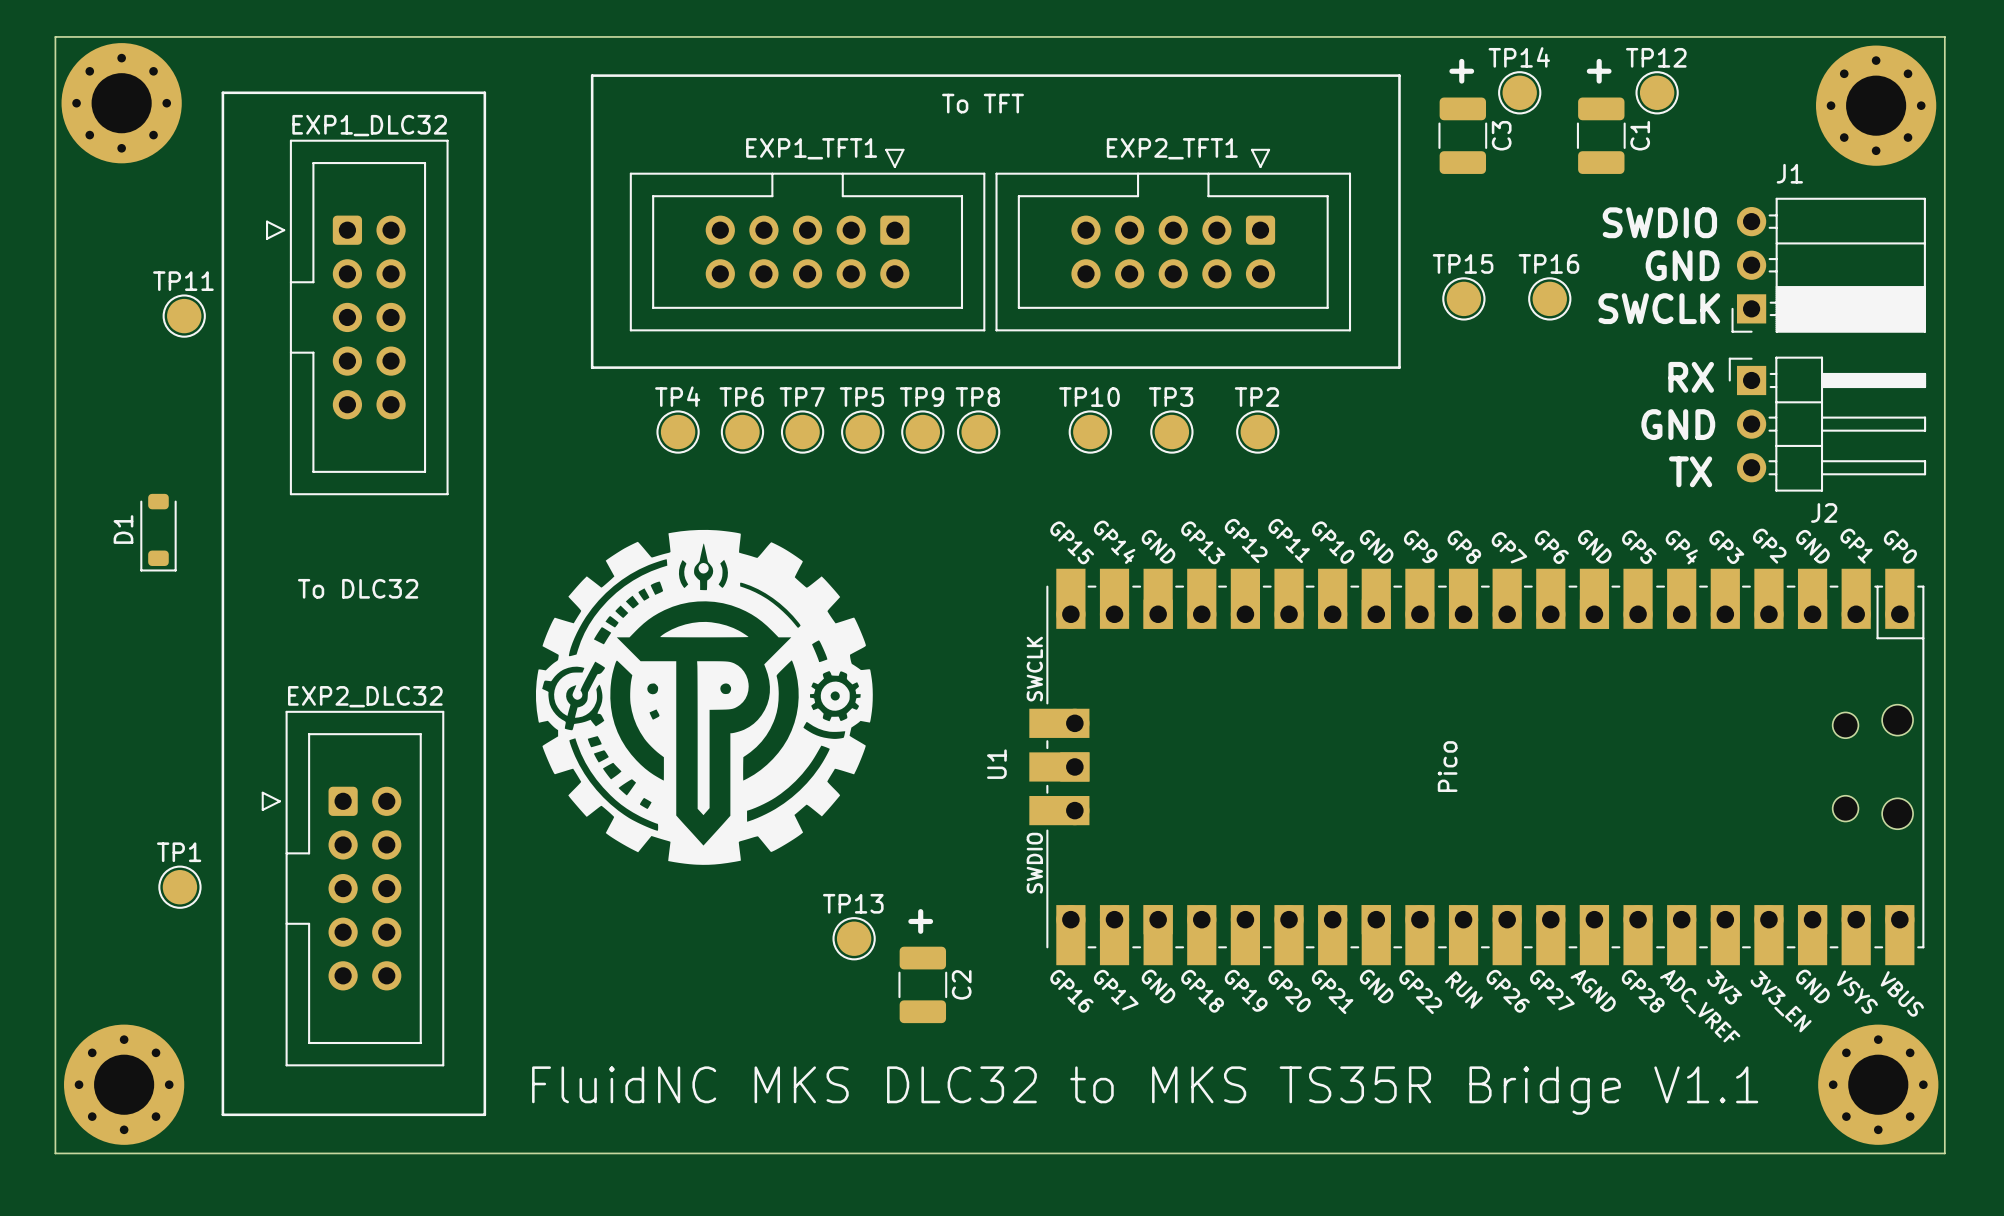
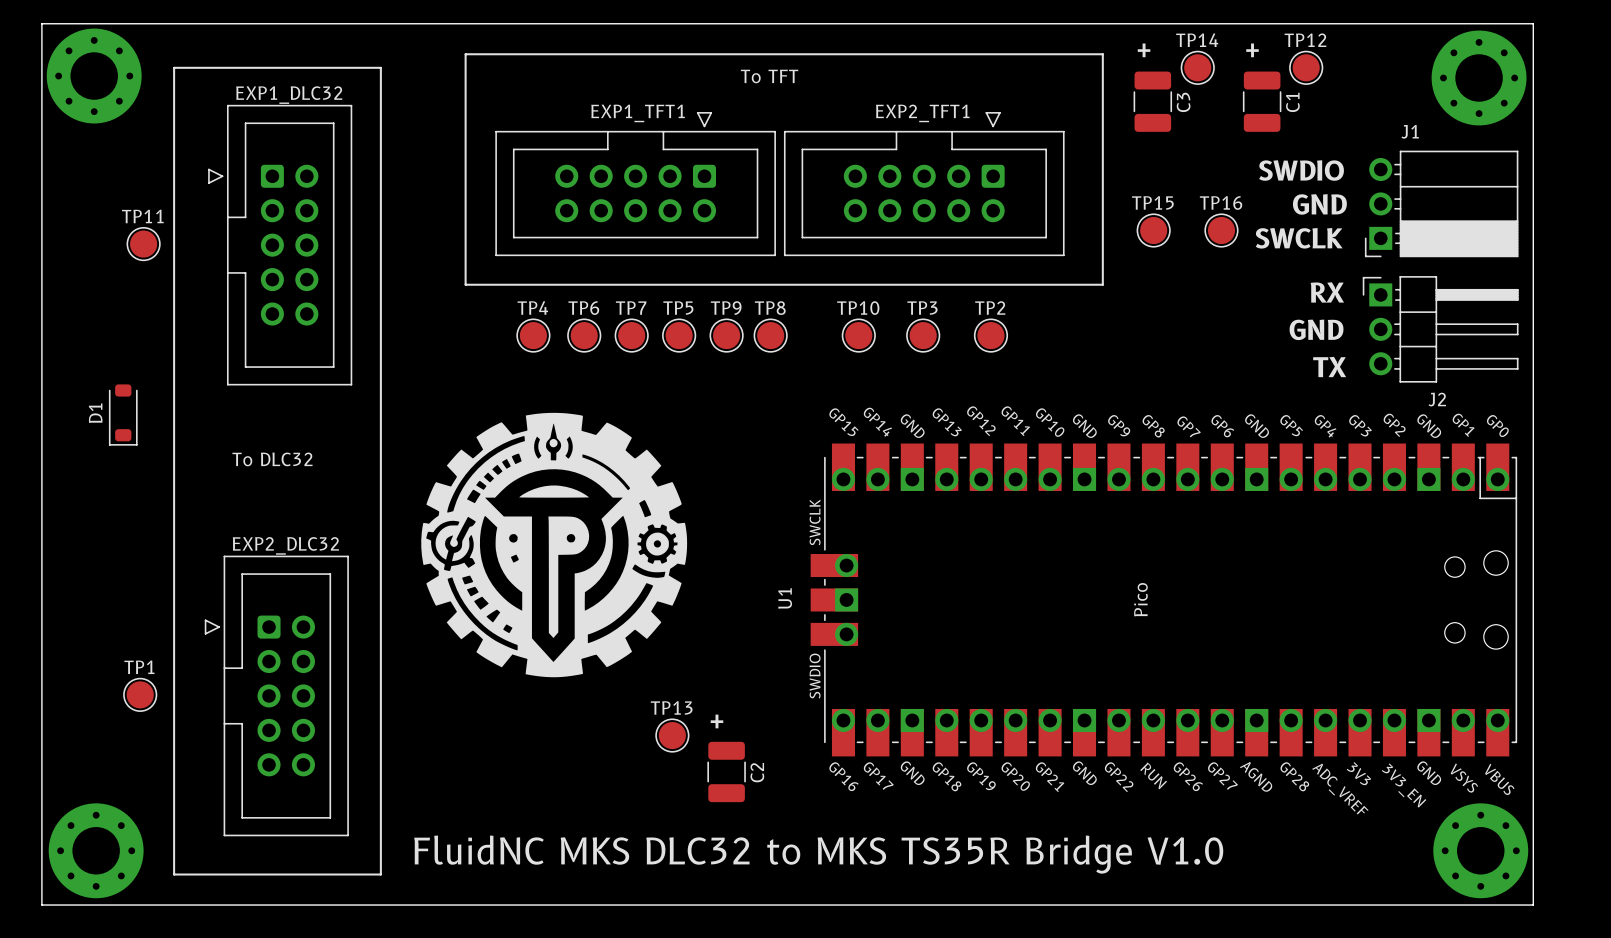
text: FluidNC MKS DLC32 to MKS TS35R Bridge V1.1 (1145, 1090) -> FluidNC MKS DLC32 to MKS TS35R Bridge V1.0 (818, 854)

